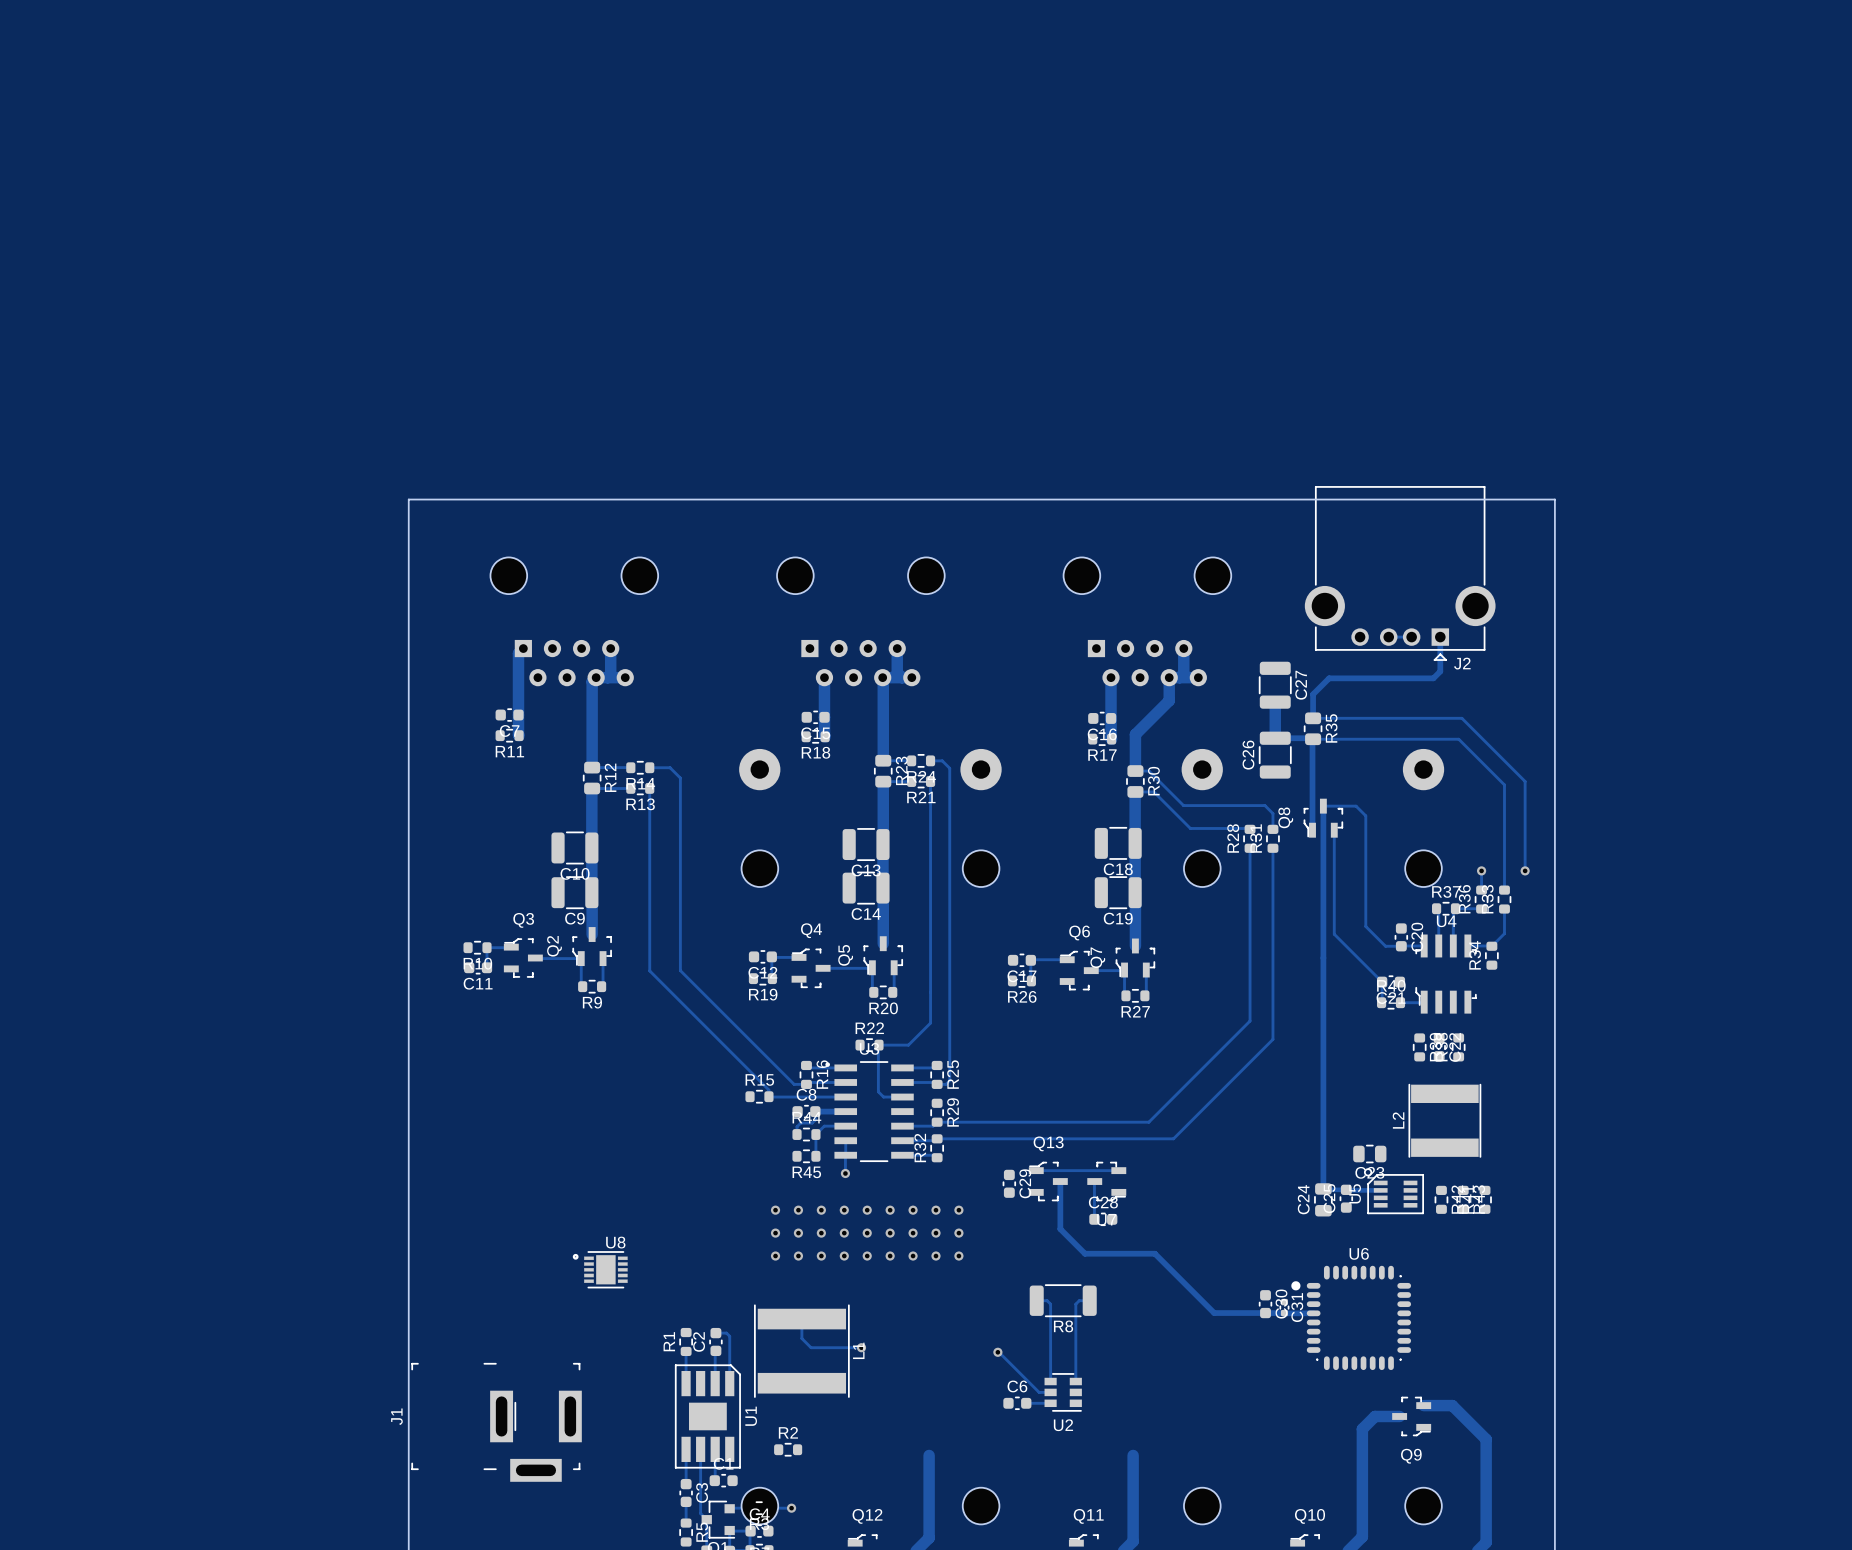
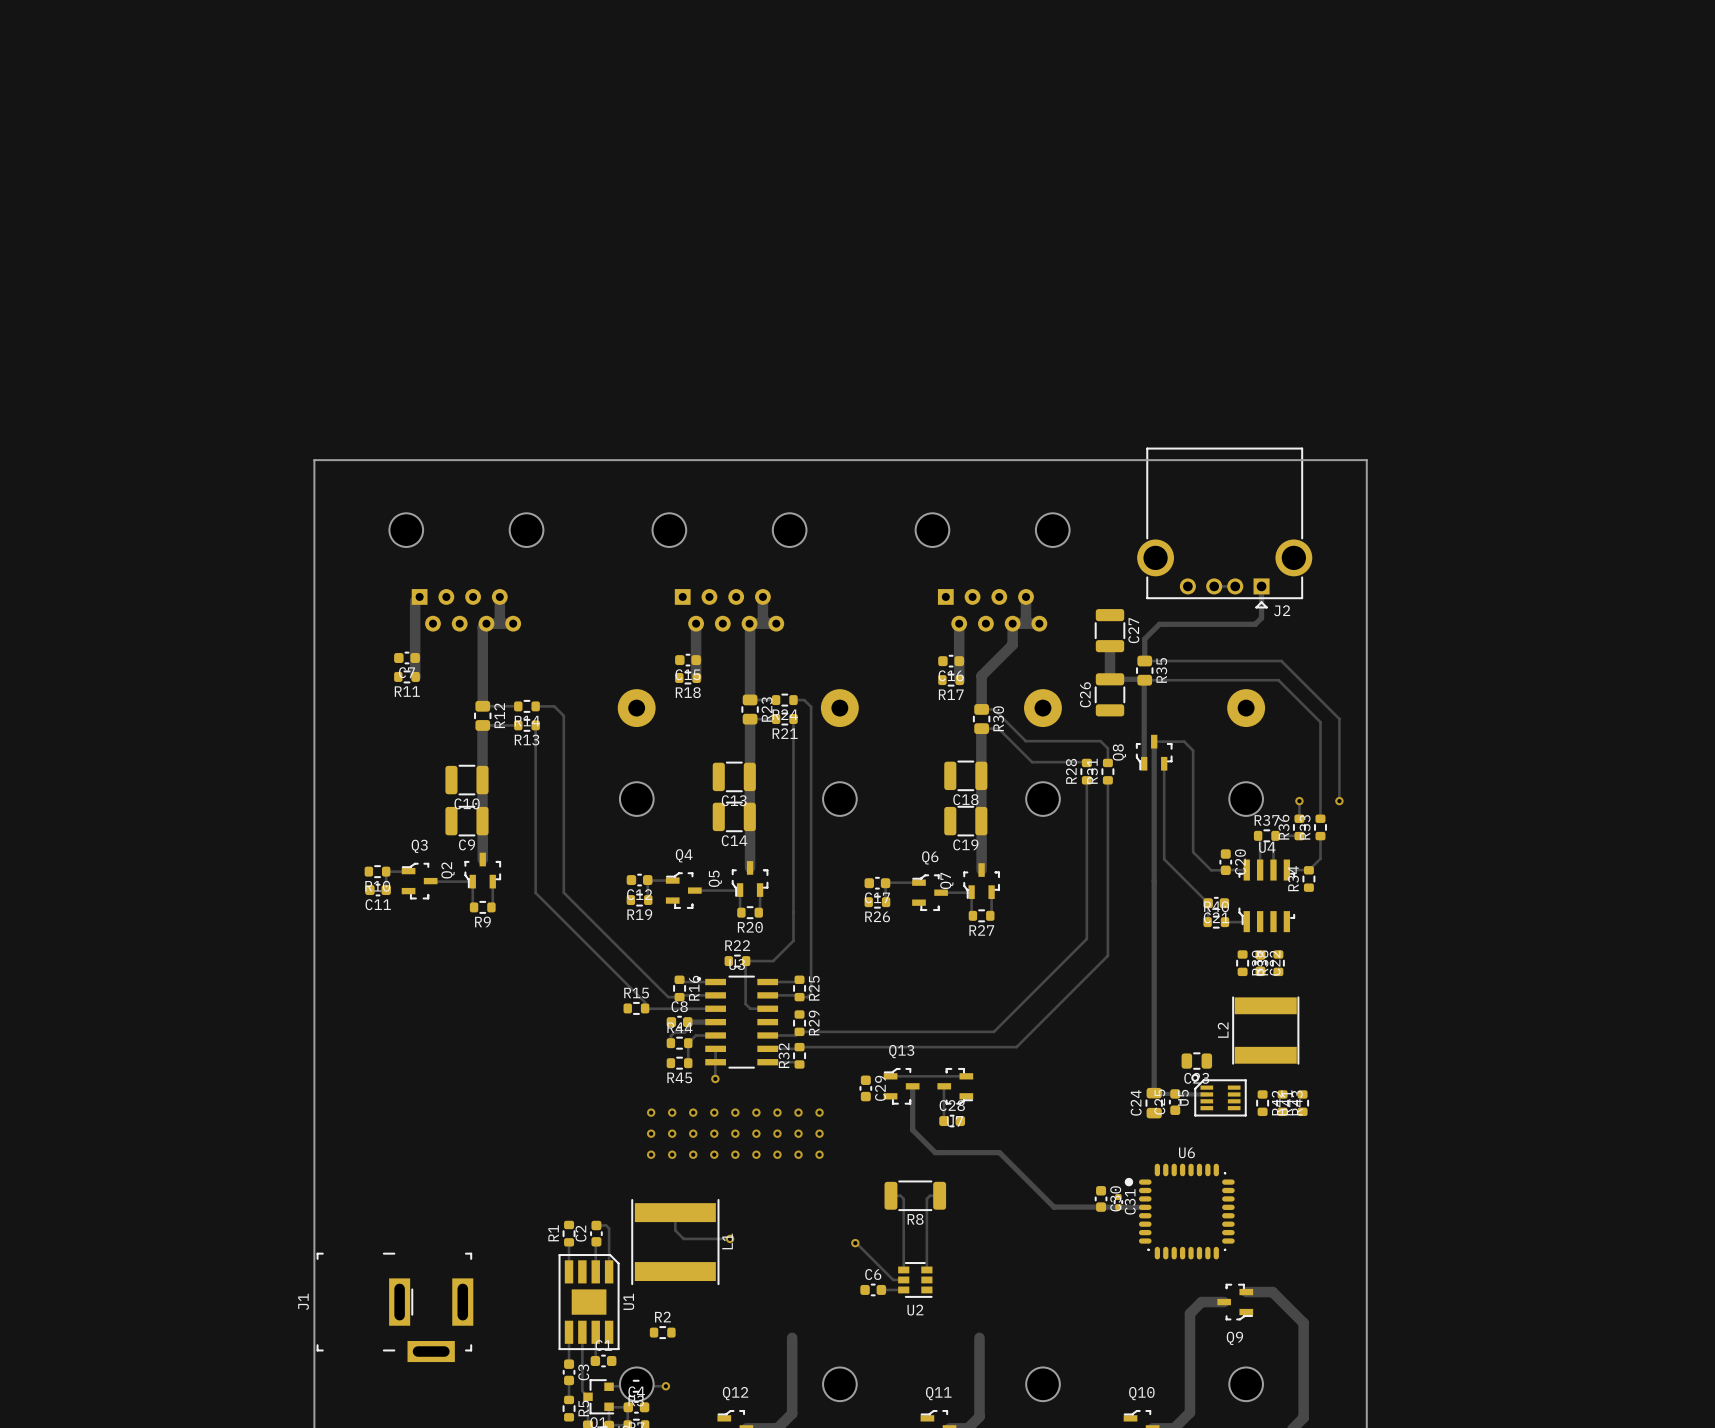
U8: (600, 1269) -> none

